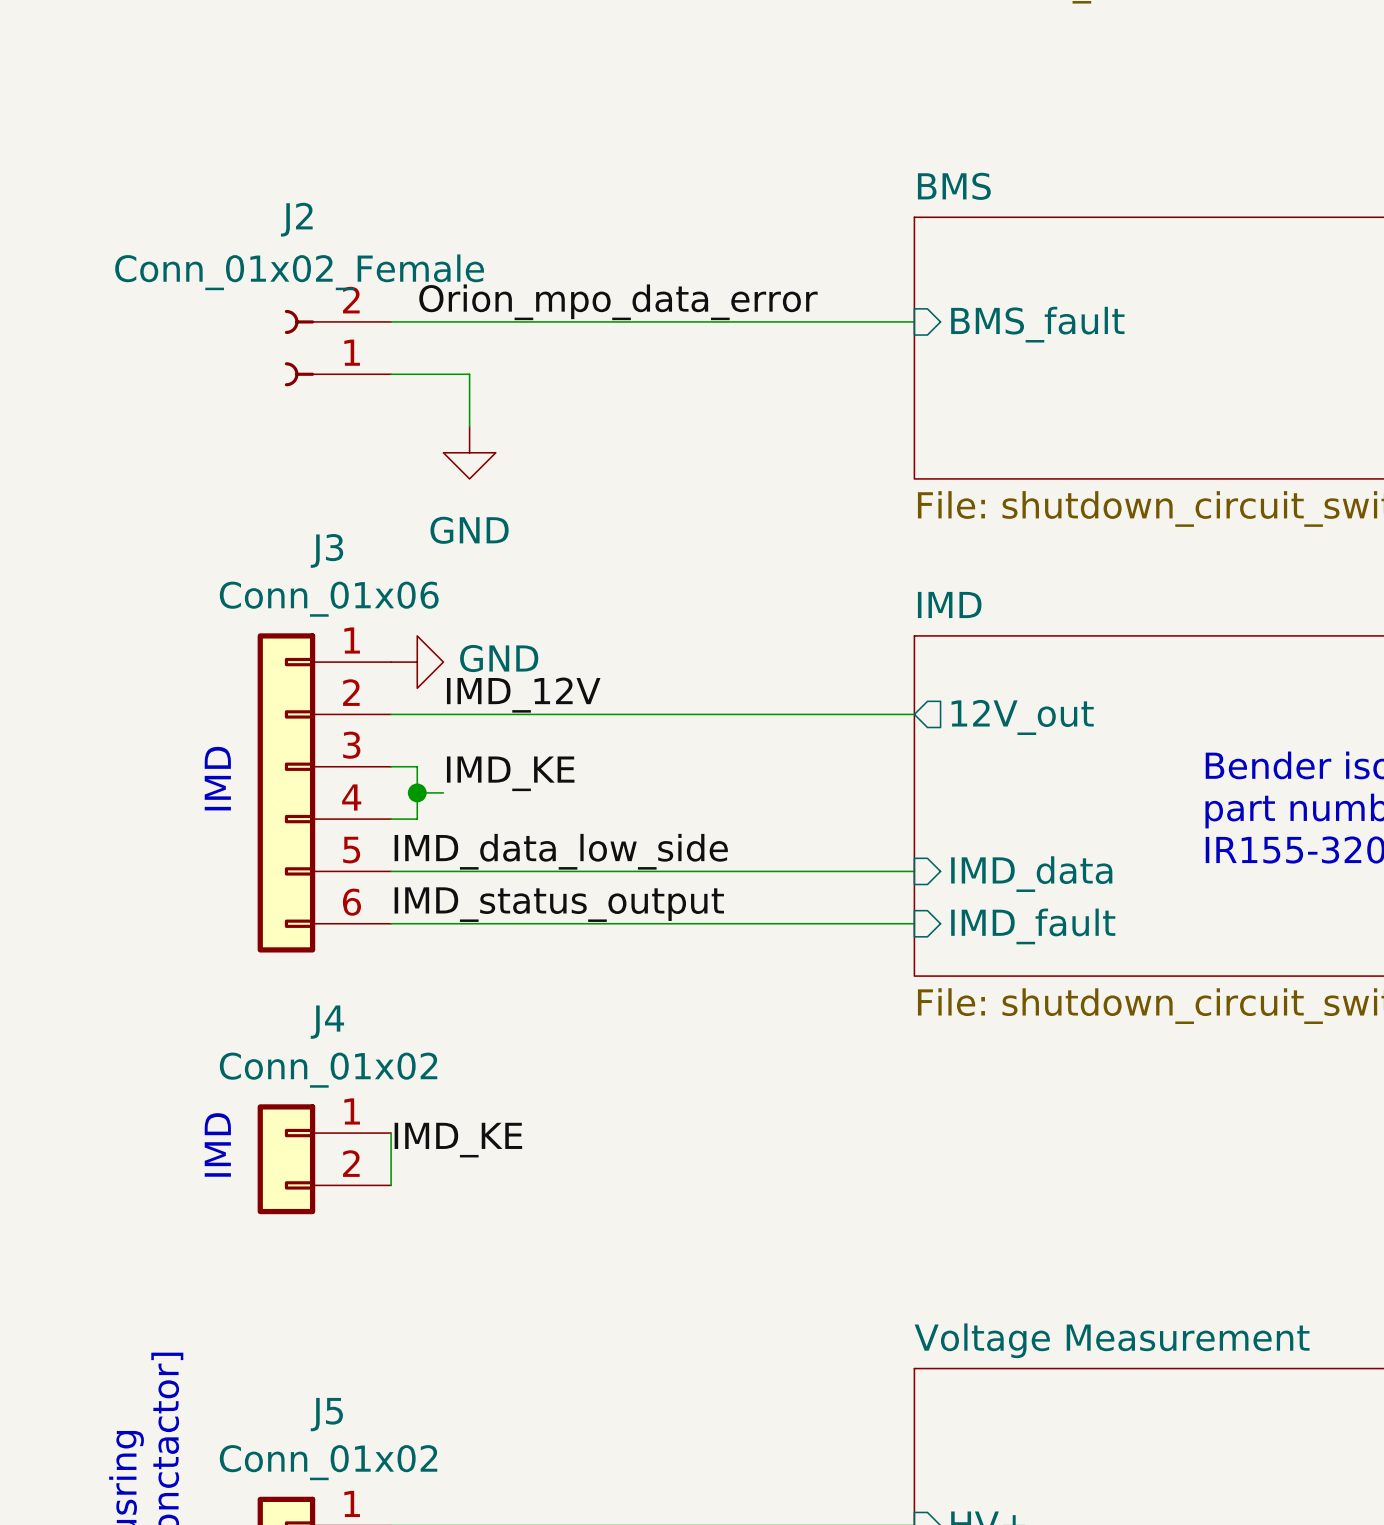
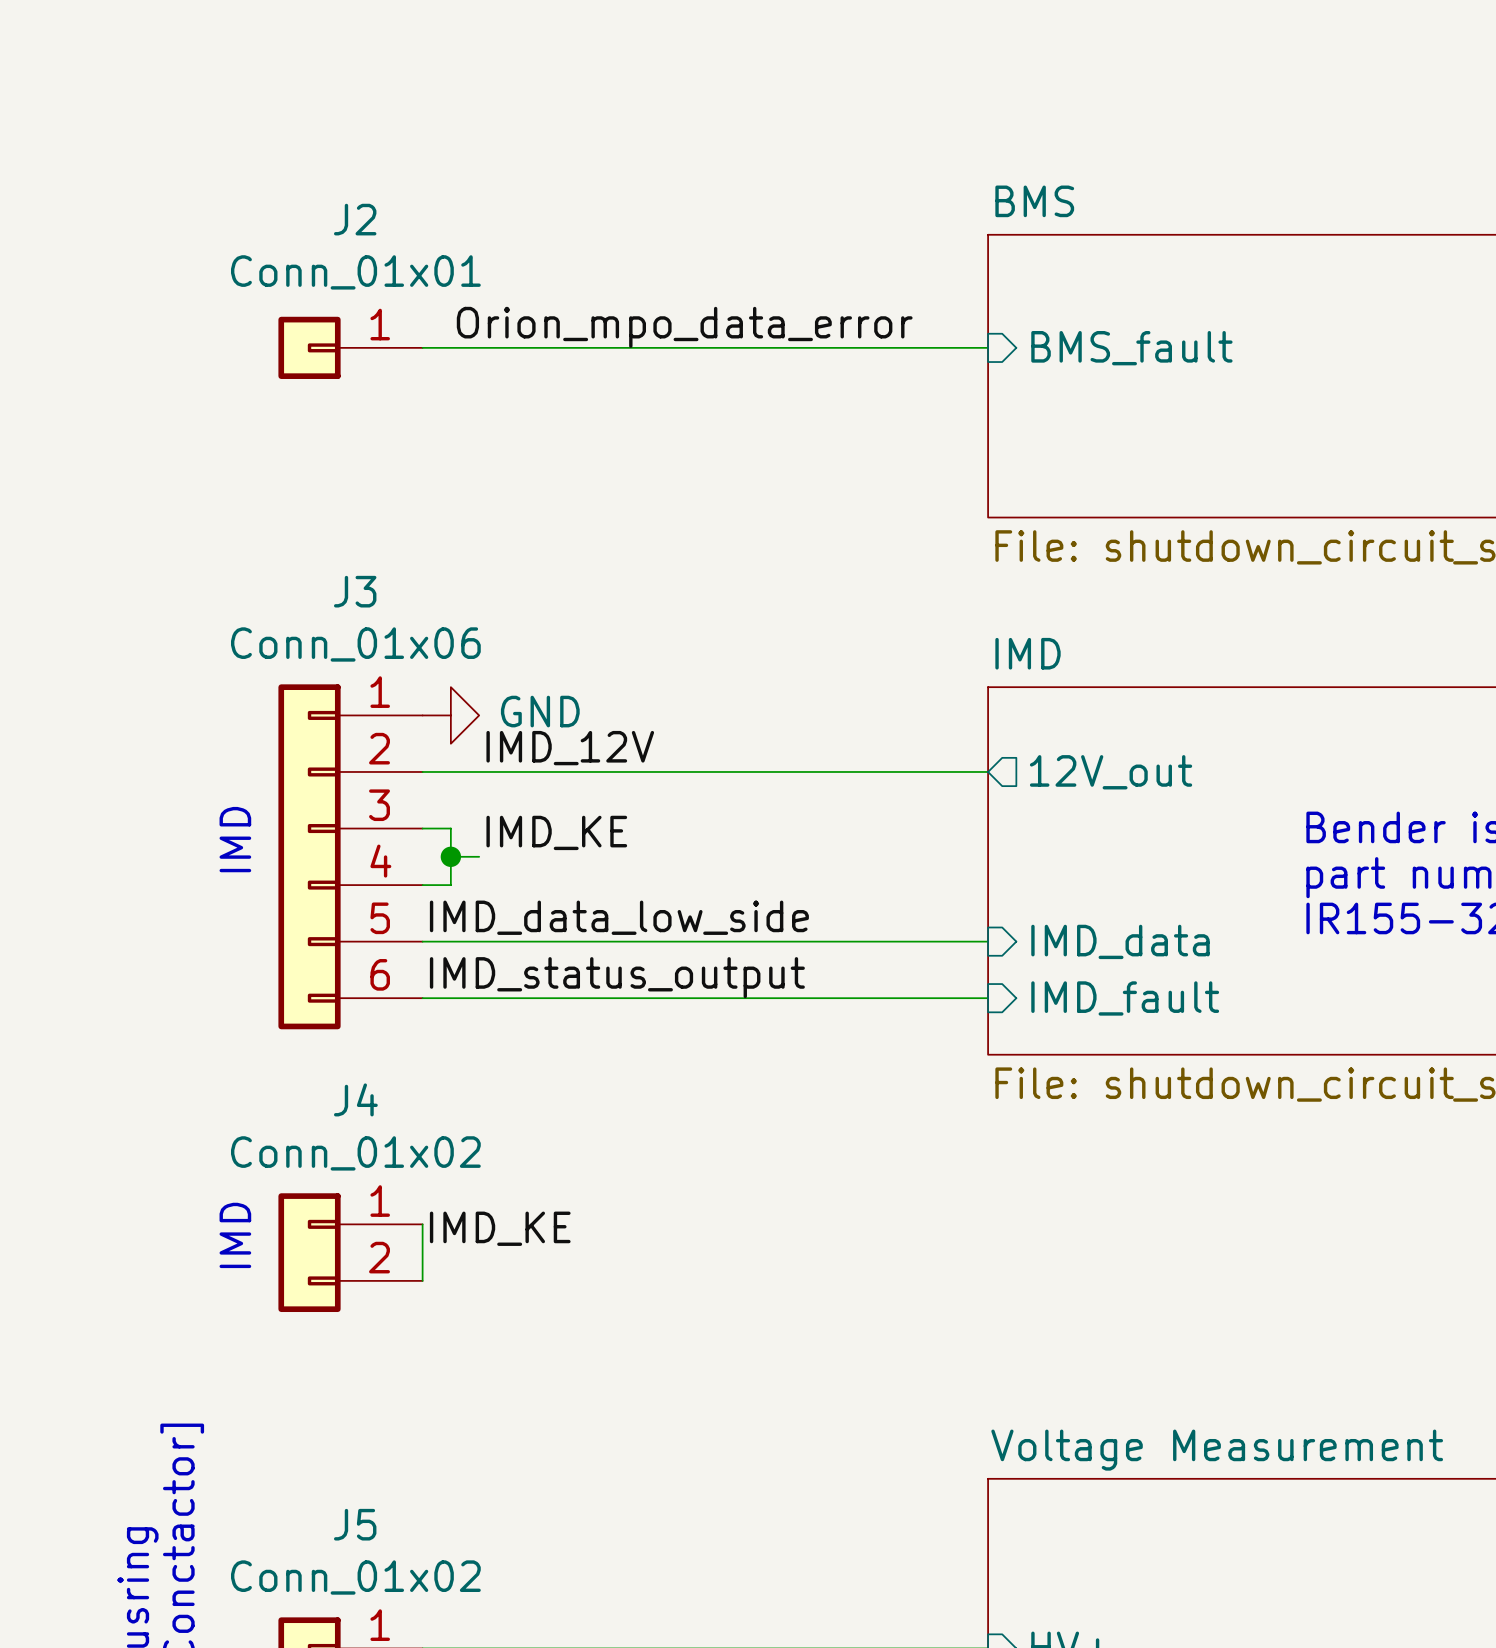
J2 name position: J2 (296, 219) -> J2 (355, 219)
J2 value: Conn_01x02_Female (299, 272) -> Conn_01x01 (355, 272)
J2 symbol: [284, 309, 392, 387] -> [278, 316, 423, 379]
wire: (391, 374) (469, 374) (469, 426) -> none
power symbol: GND (469, 452) -> none

